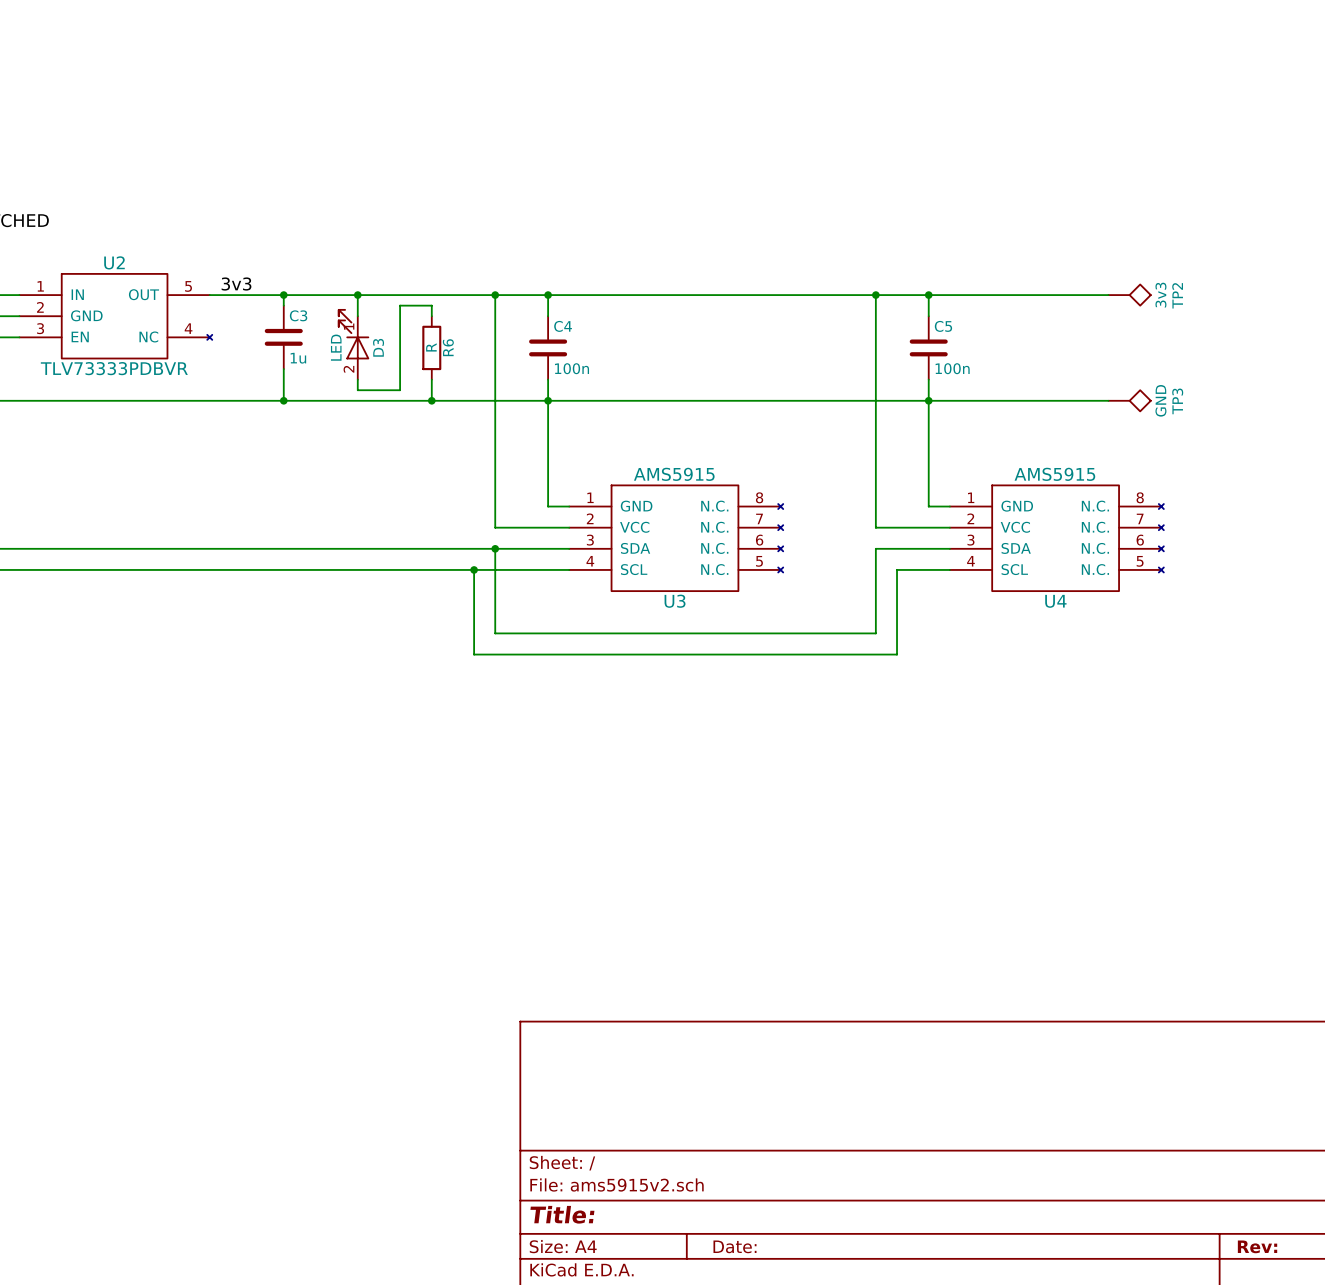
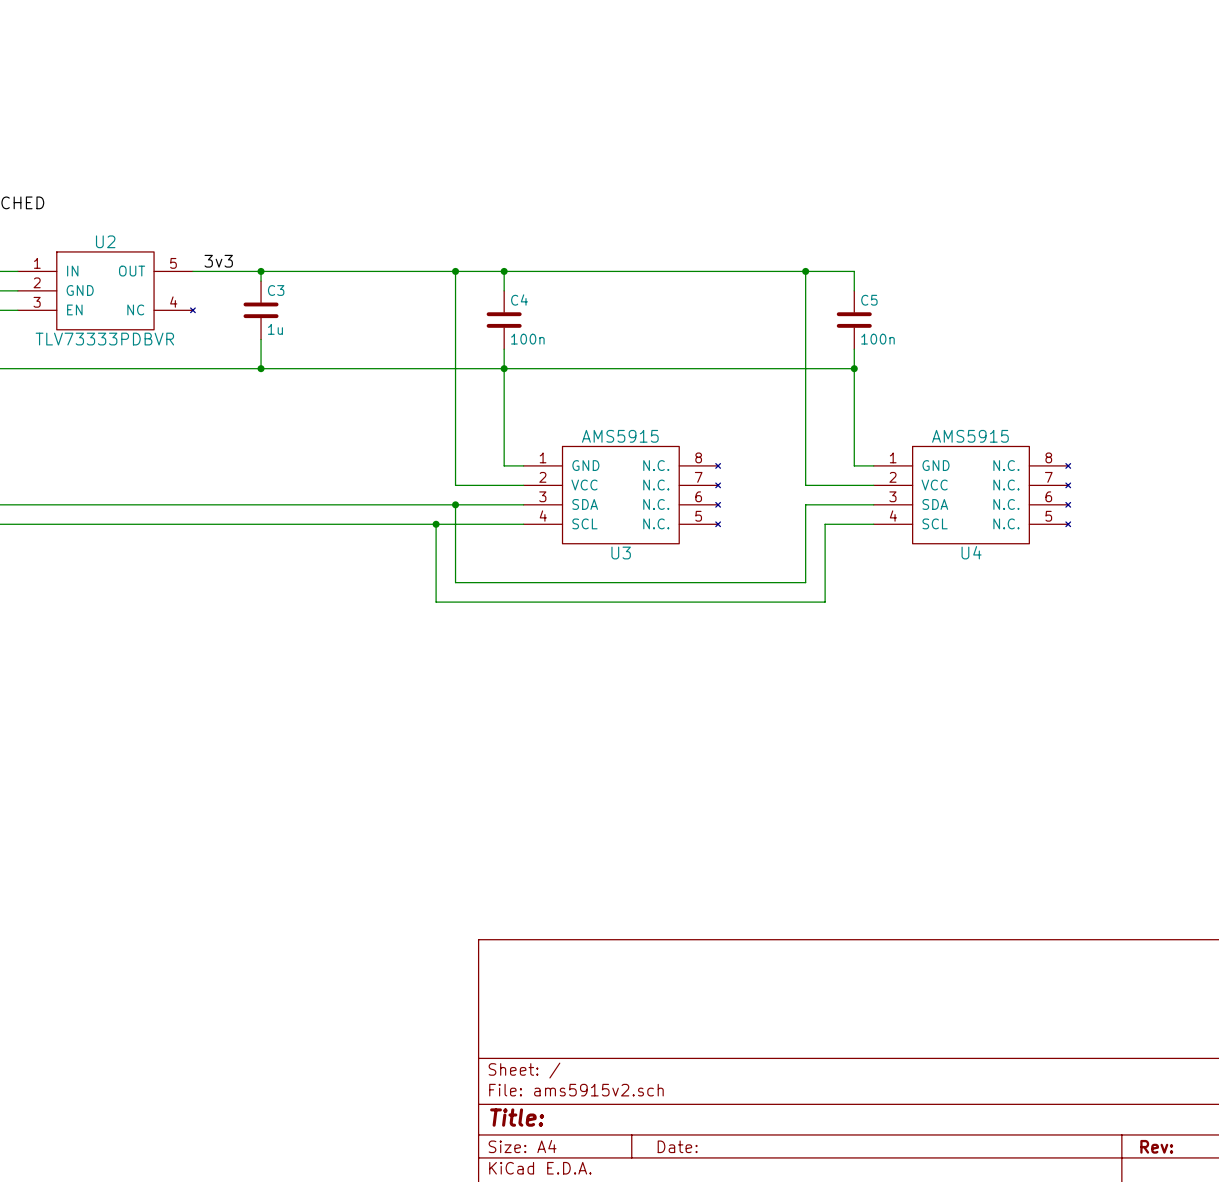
wire: (357, 295) (357, 316) -> none
junction: (357, 295) -> none
wire: (928, 295) (1108, 295) -> none
junction: (928, 295) -> none
TP2: 3v3 (1129, 295) -> none
wire: (431, 316) (431, 305) (400, 305) (400, 390) (357, 390) (357, 379) -> none
D3: LED (353, 344) -> none
R6: R (431, 347) -> none
wire: (431, 379) (431, 400) -> none
junction: (431, 400) -> none
wire: (928, 400) (1108, 400) -> none
TP3: GND (1129, 400) -> none

